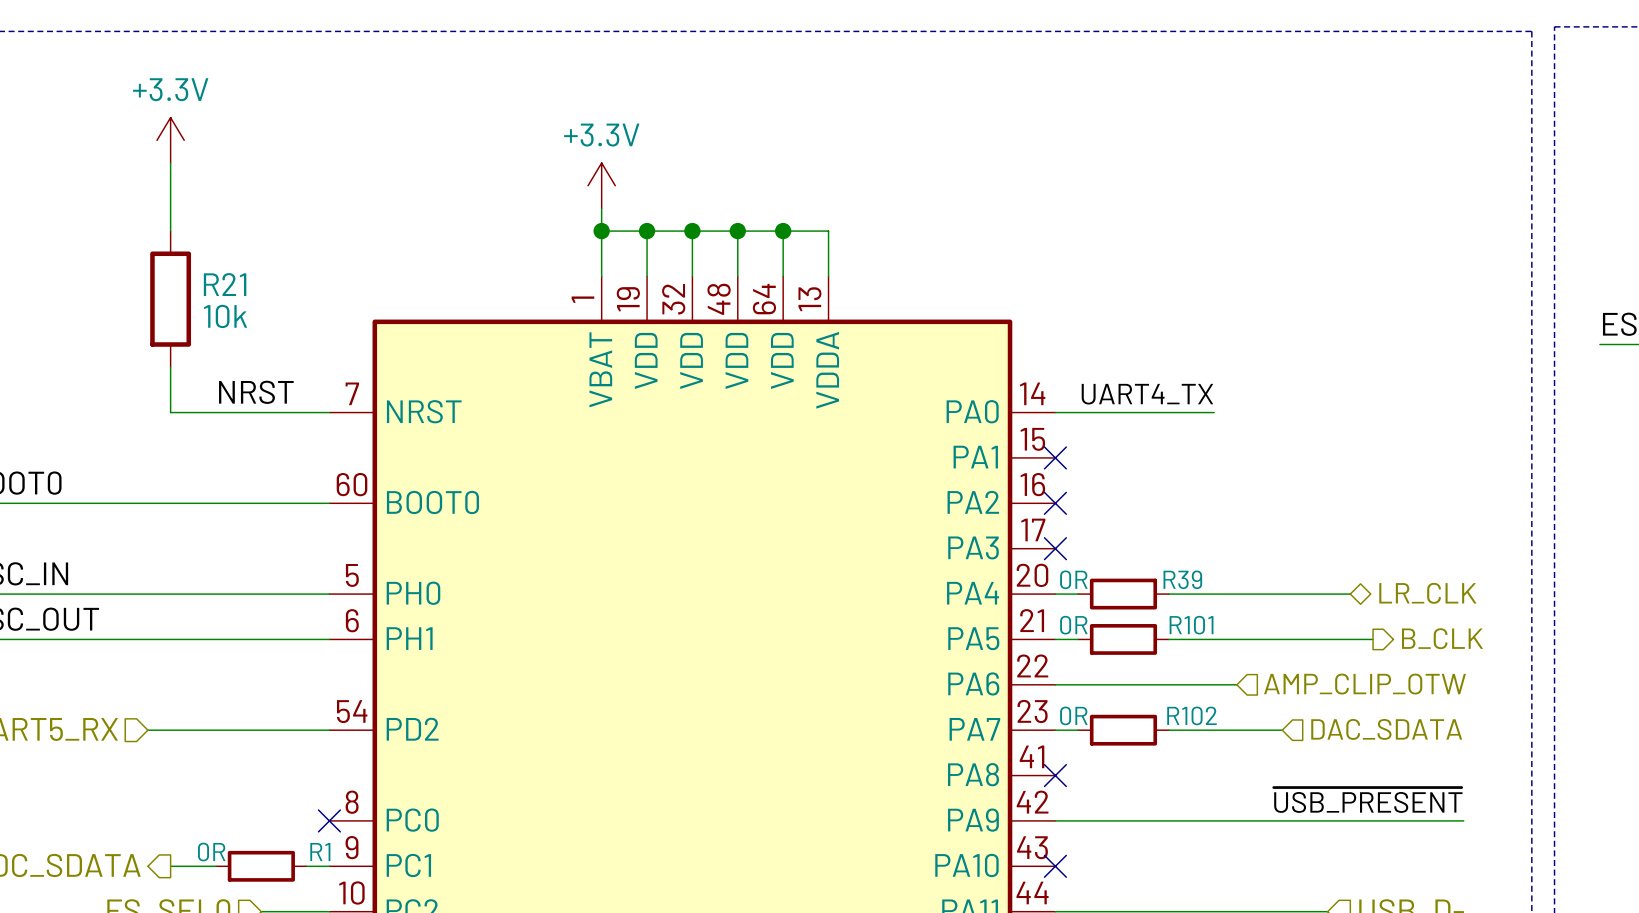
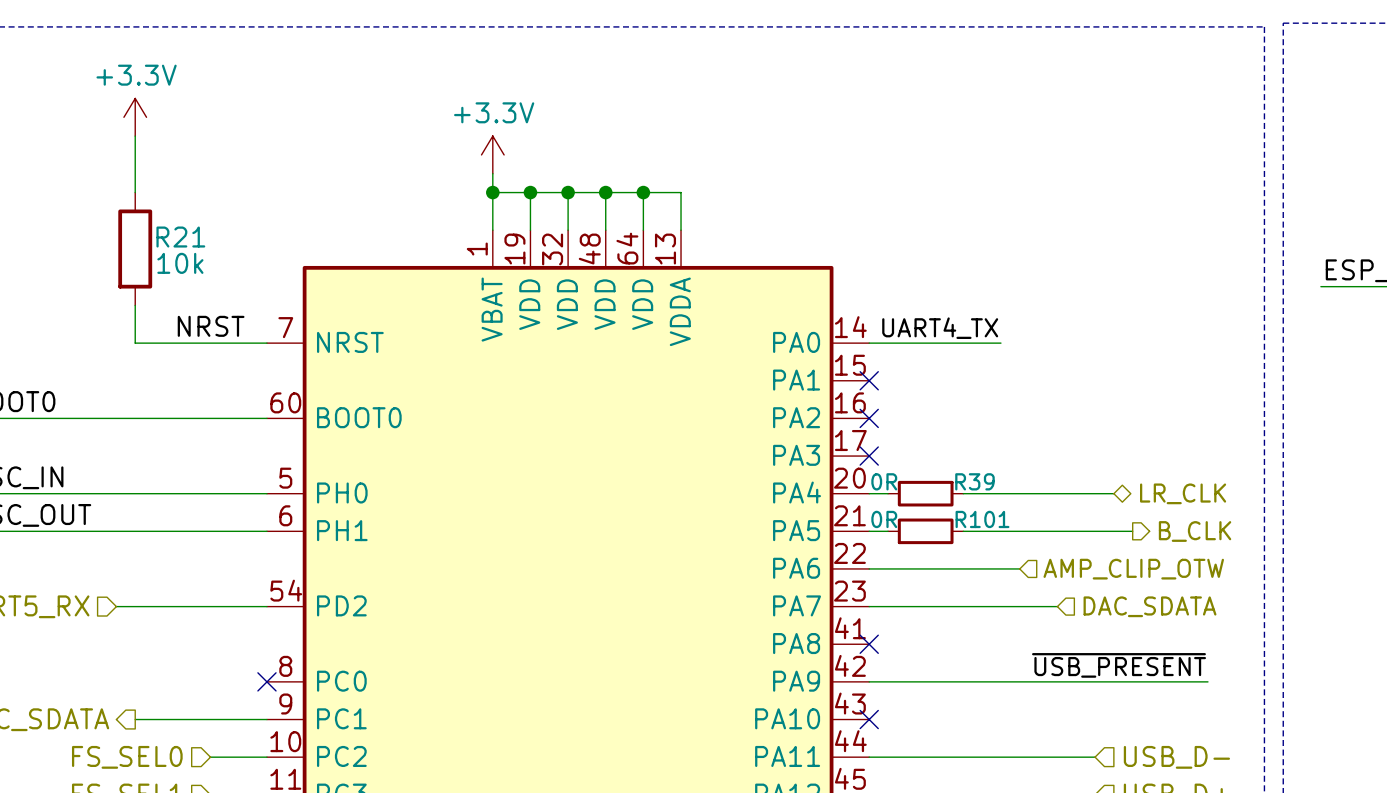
wire: none -> (888, 606) (963, 606)
R102: 0R (1123, 730) -> none
wire: none -> (172, 719) (248, 719)
R1: 0R (261, 866) -> none

